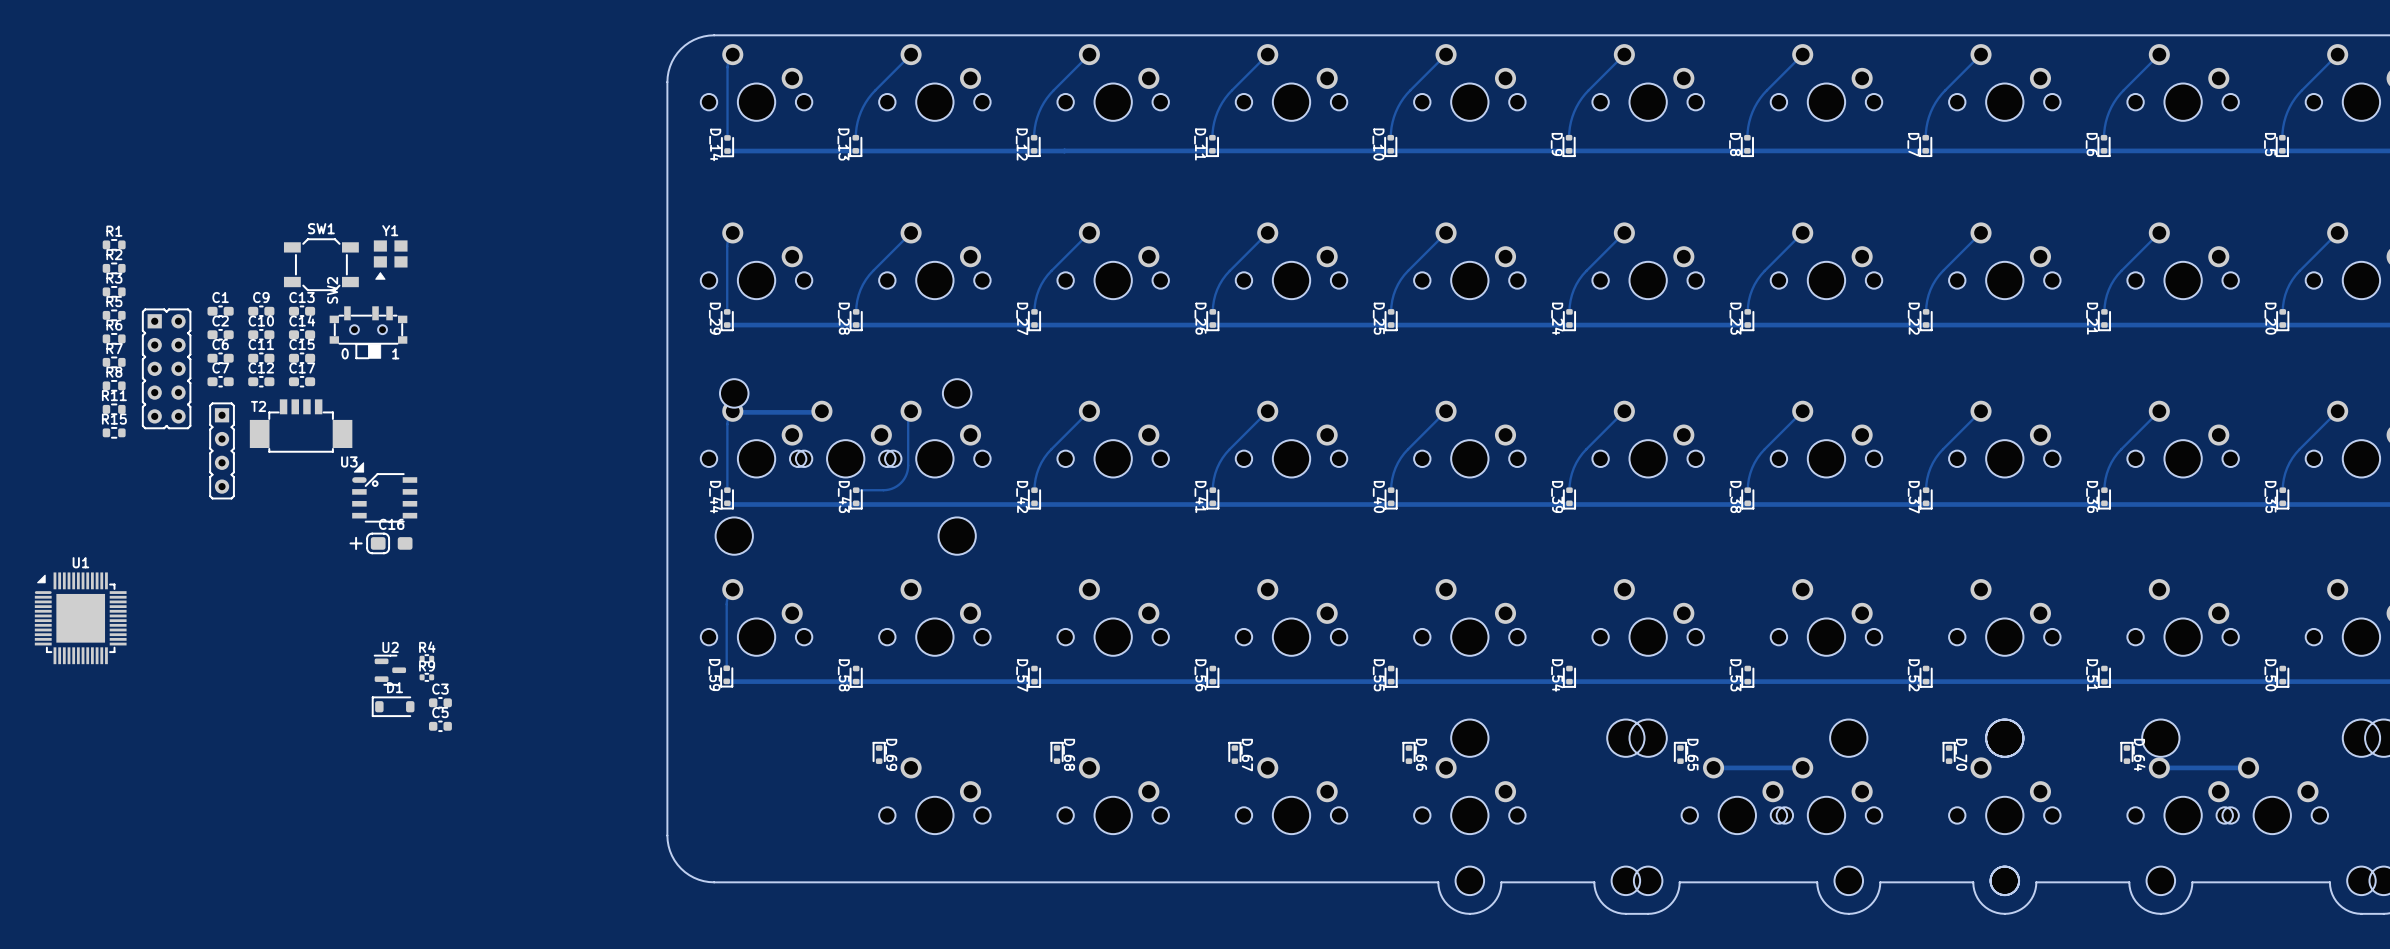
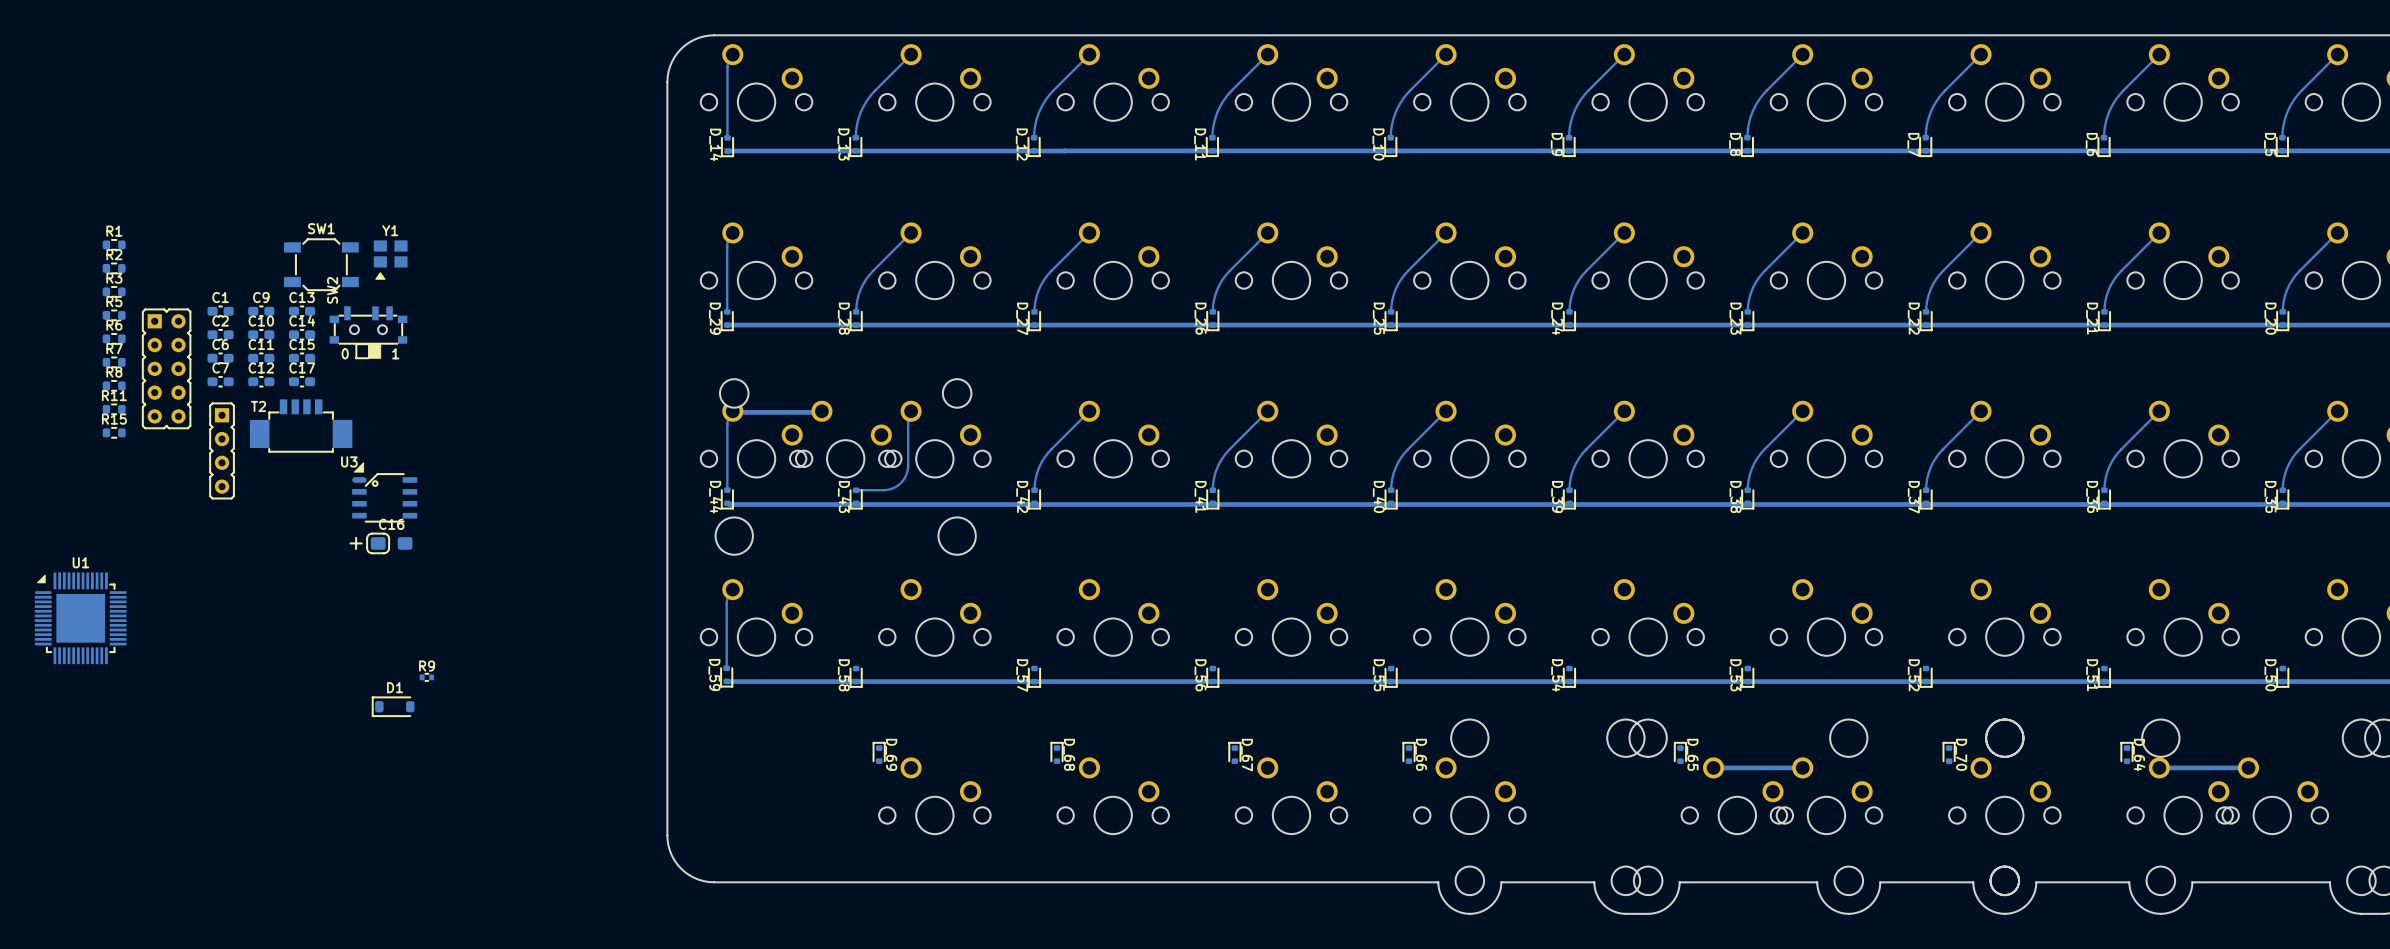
R4: (426, 658) -> none
U2: (390, 670) -> none
C3: (440, 702) -> none
C5: (440, 726) -> none

